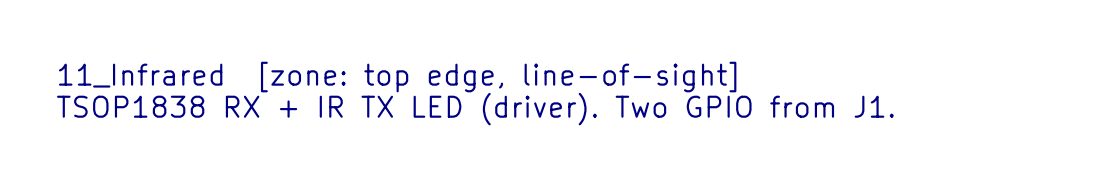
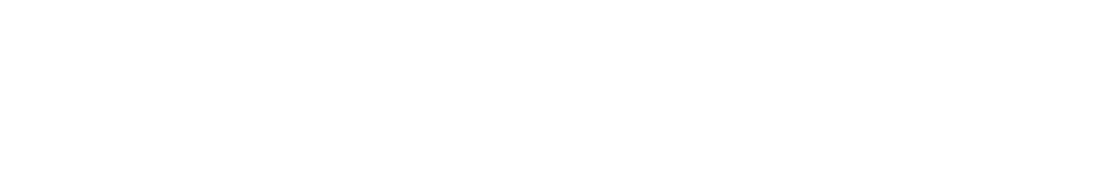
text: 11_Infrared [zone: top edge, line-of-sight] (397, 77) -> none
text: TSOP1838 RX + IR TX LED (driver). Two GPIO from J1. (475, 109) -> none

